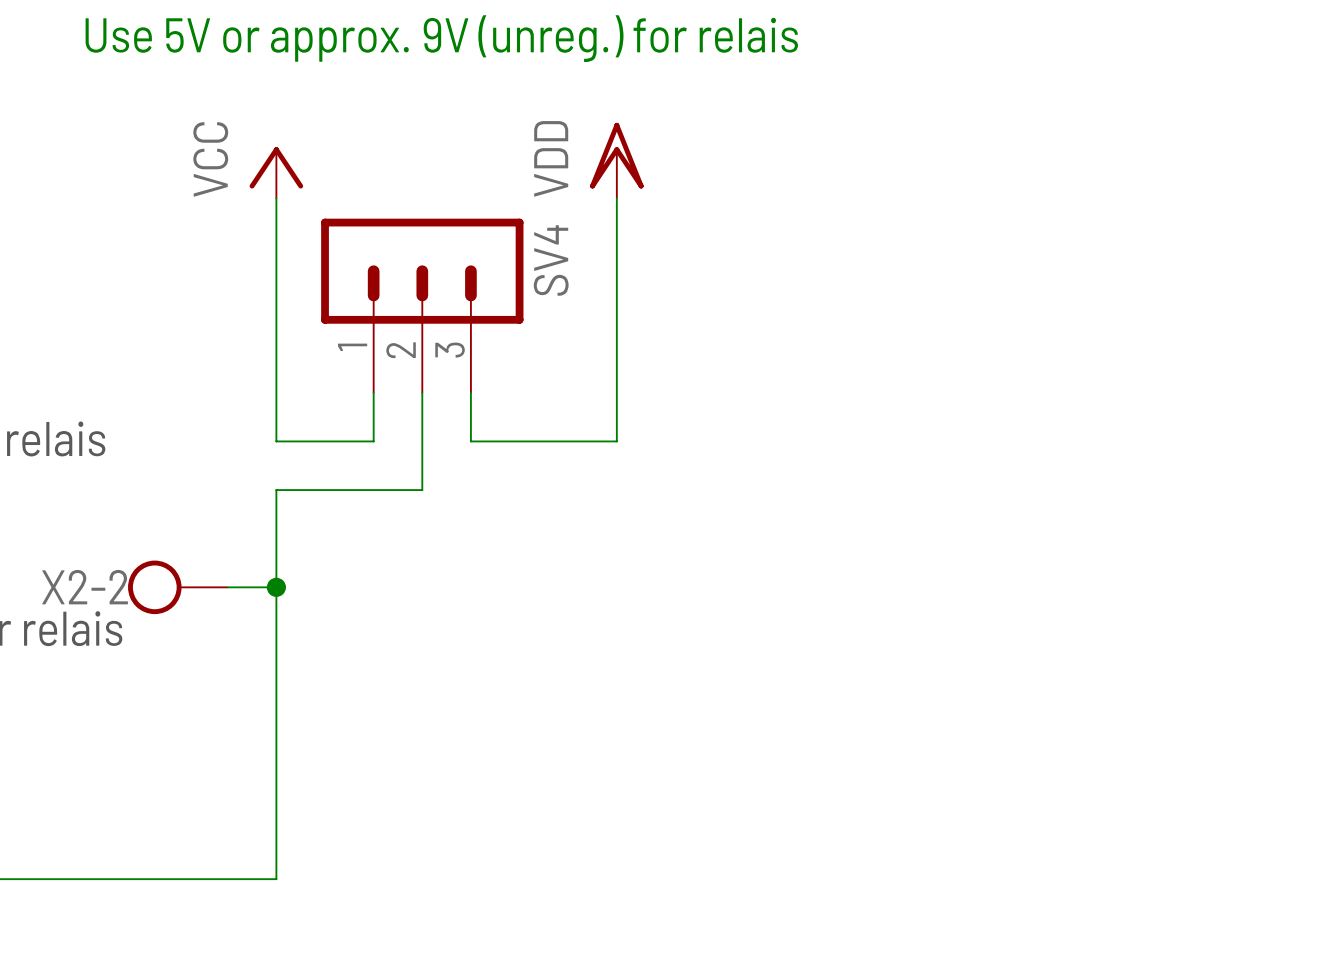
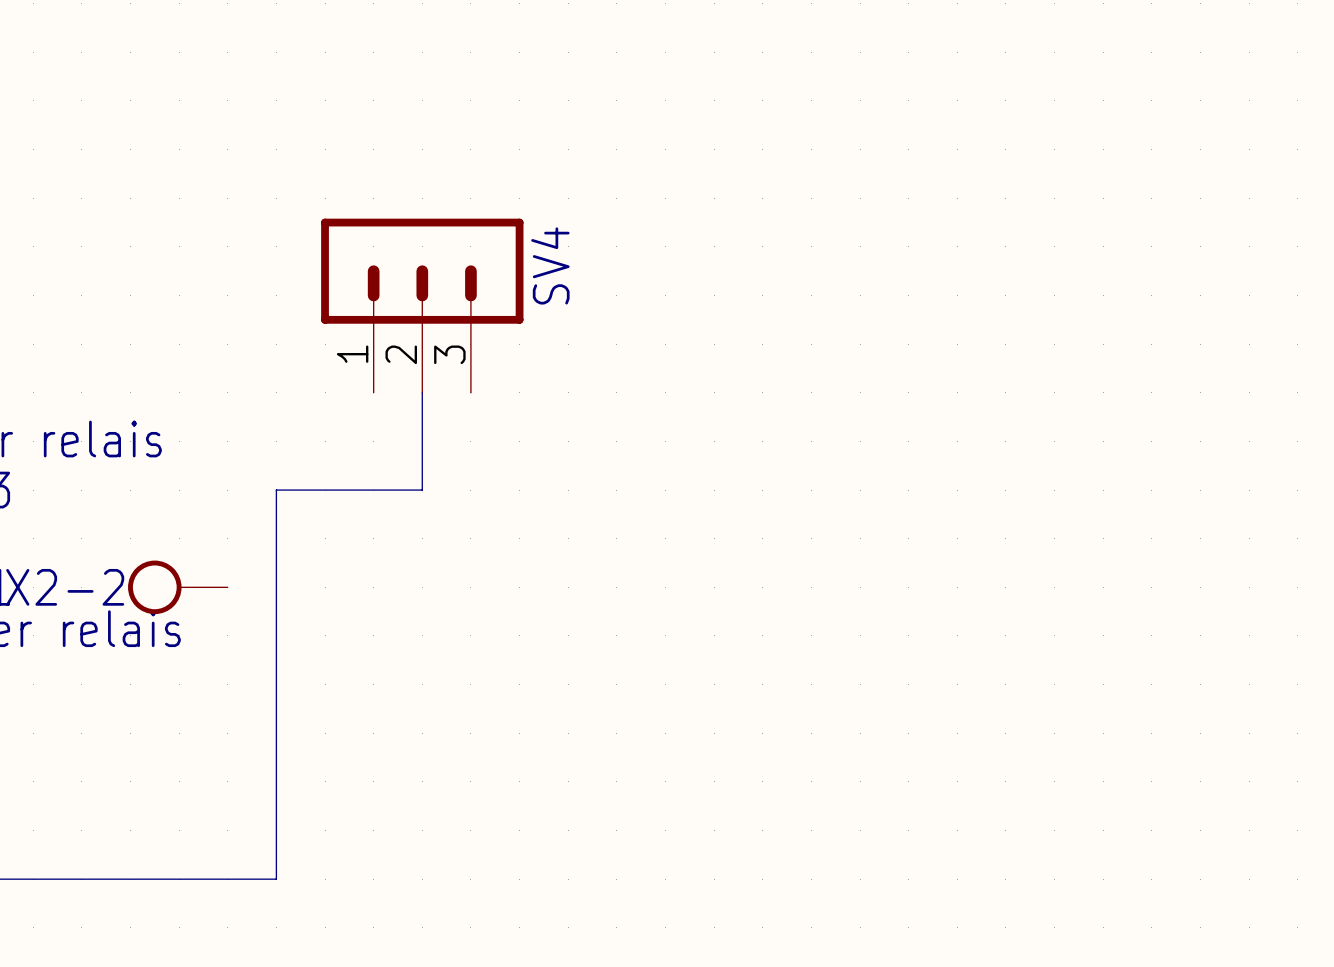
text: Use 5V or approx. 9V (unreg.) for relais (441, 38) -> none
power symbol: VDD (616, 160) -> none
power symbol: VCC (276, 172) -> none
wire: (276, 198) (276, 441) (373, 441) (373, 392) -> none
wire: (616, 198) (616, 441) (470, 441) (470, 392) -> none
wire: (227, 587) (276, 587) -> none
junction: (276, 587) -> none

